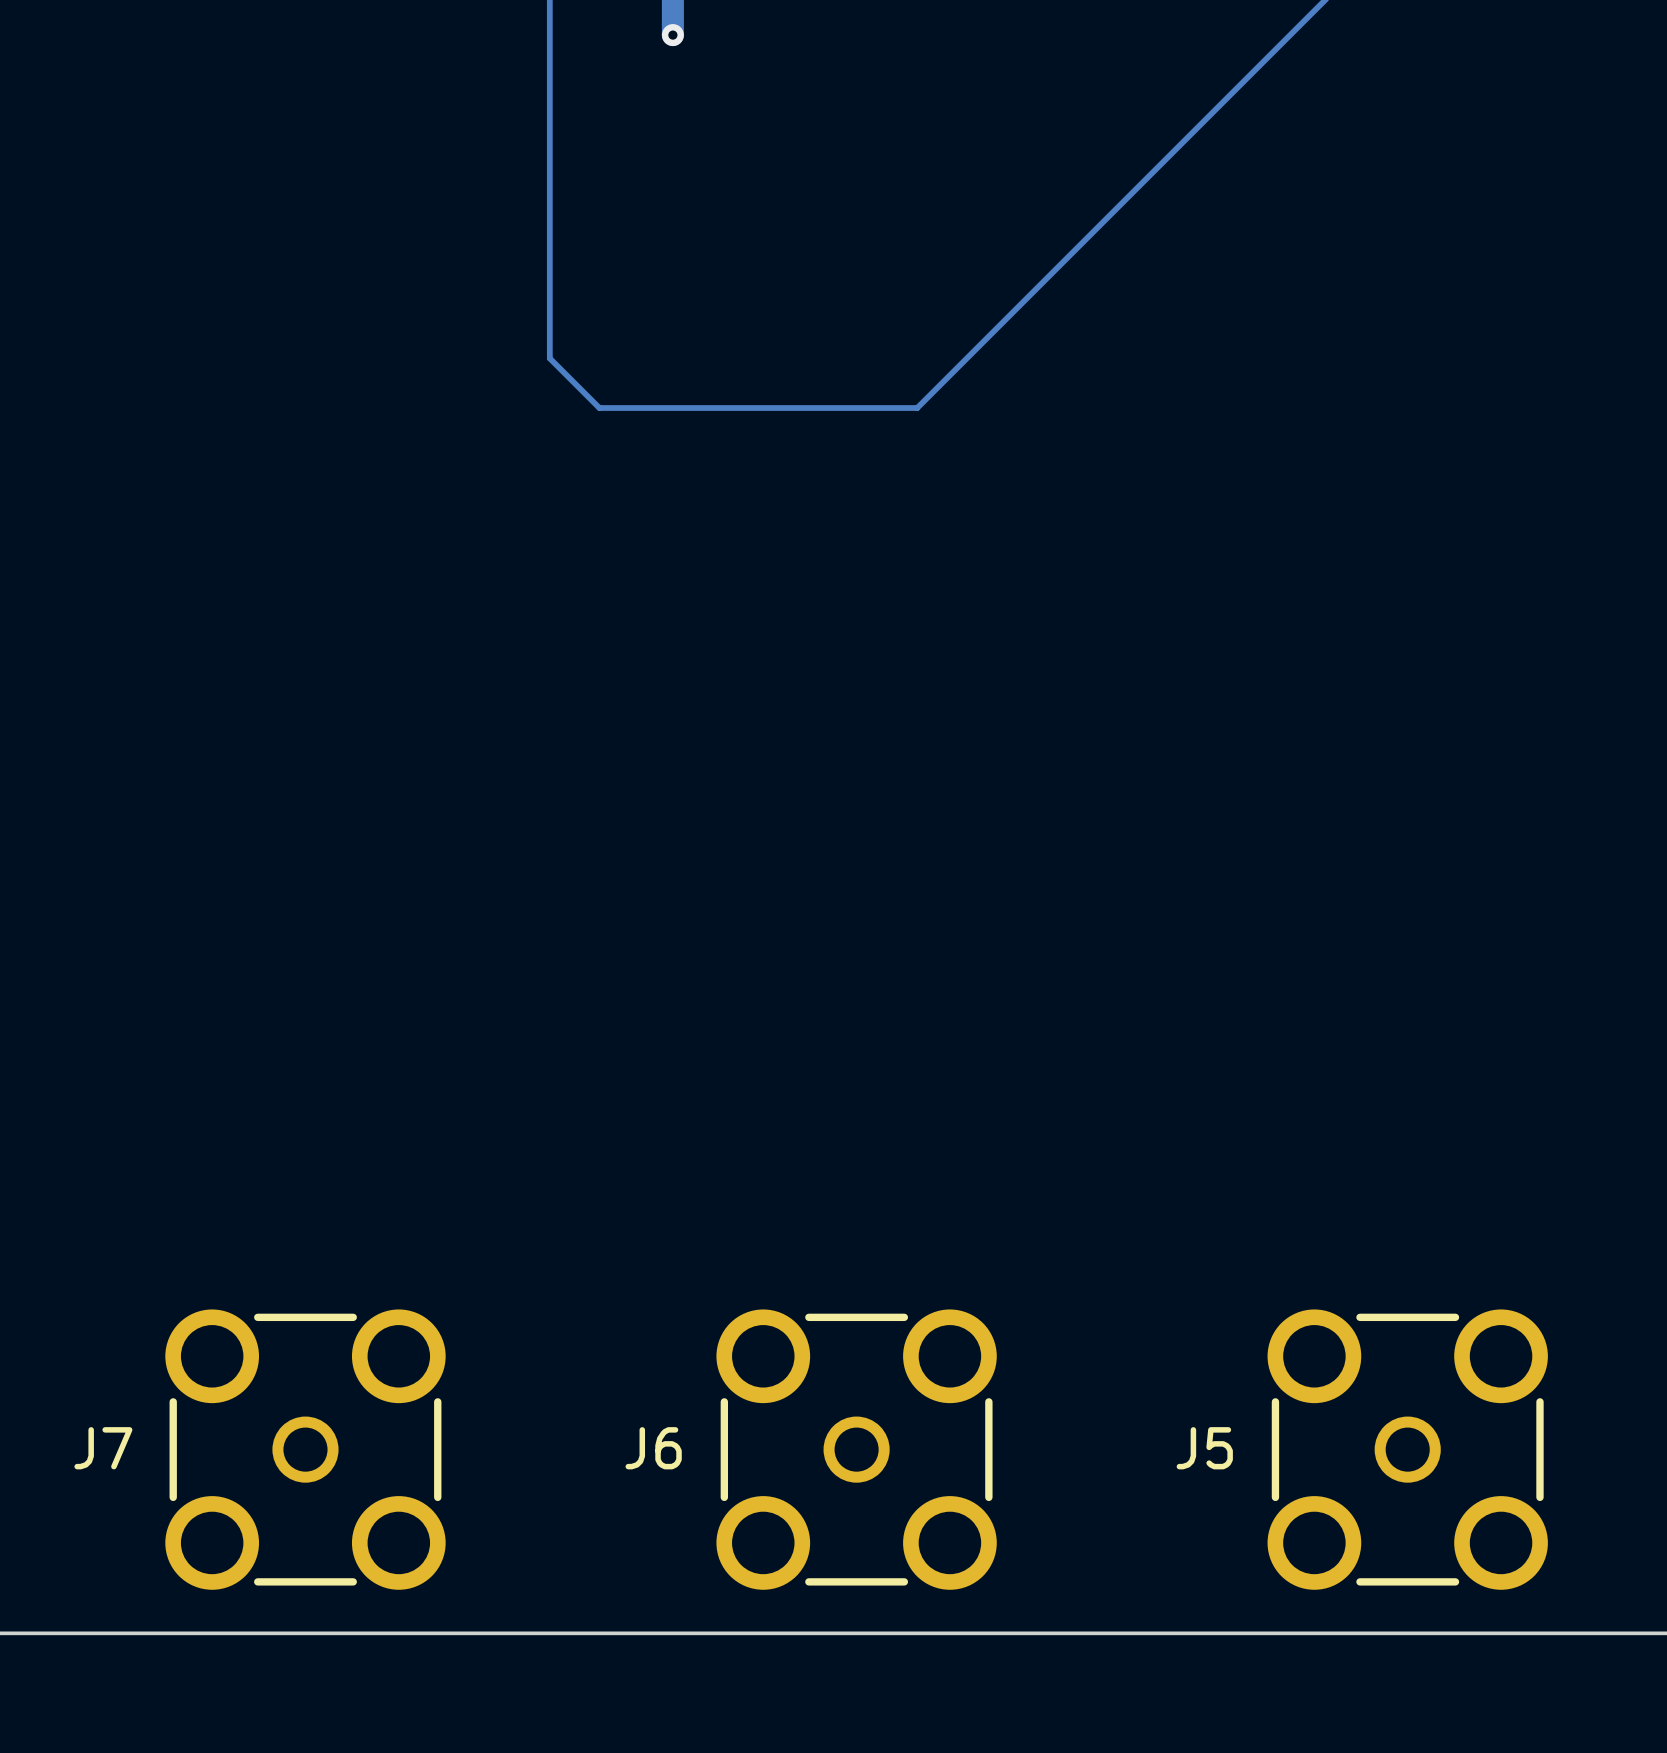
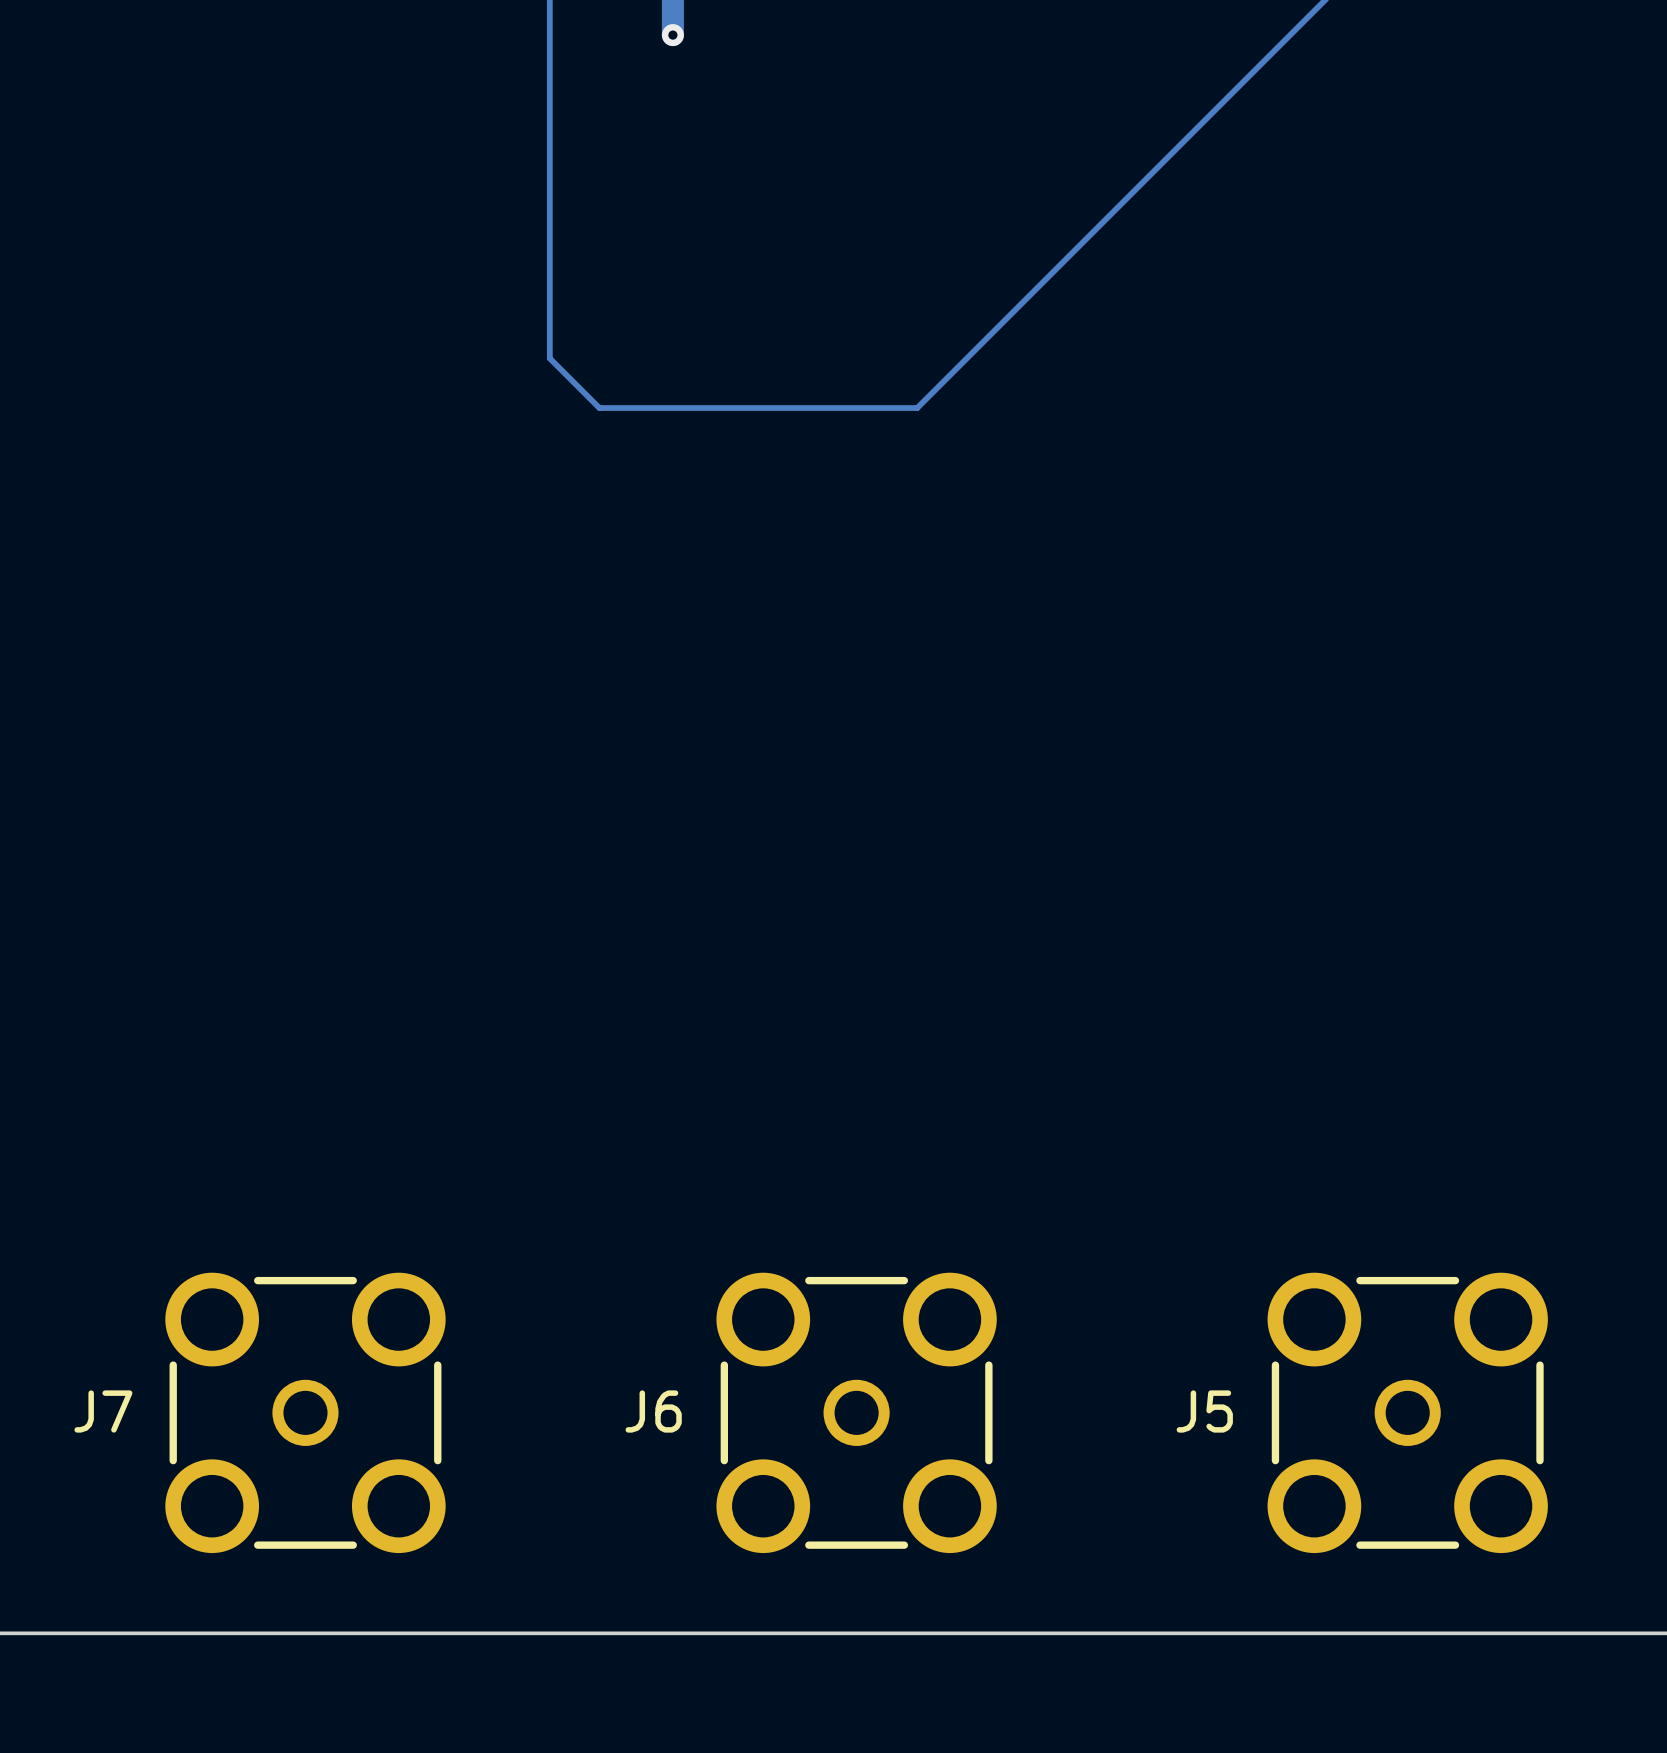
J7 position: (305, 1449) -> (305, 1412)
J6 position: (856, 1449) -> (856, 1412)
J5 position: (1407, 1449) -> (1407, 1412)

